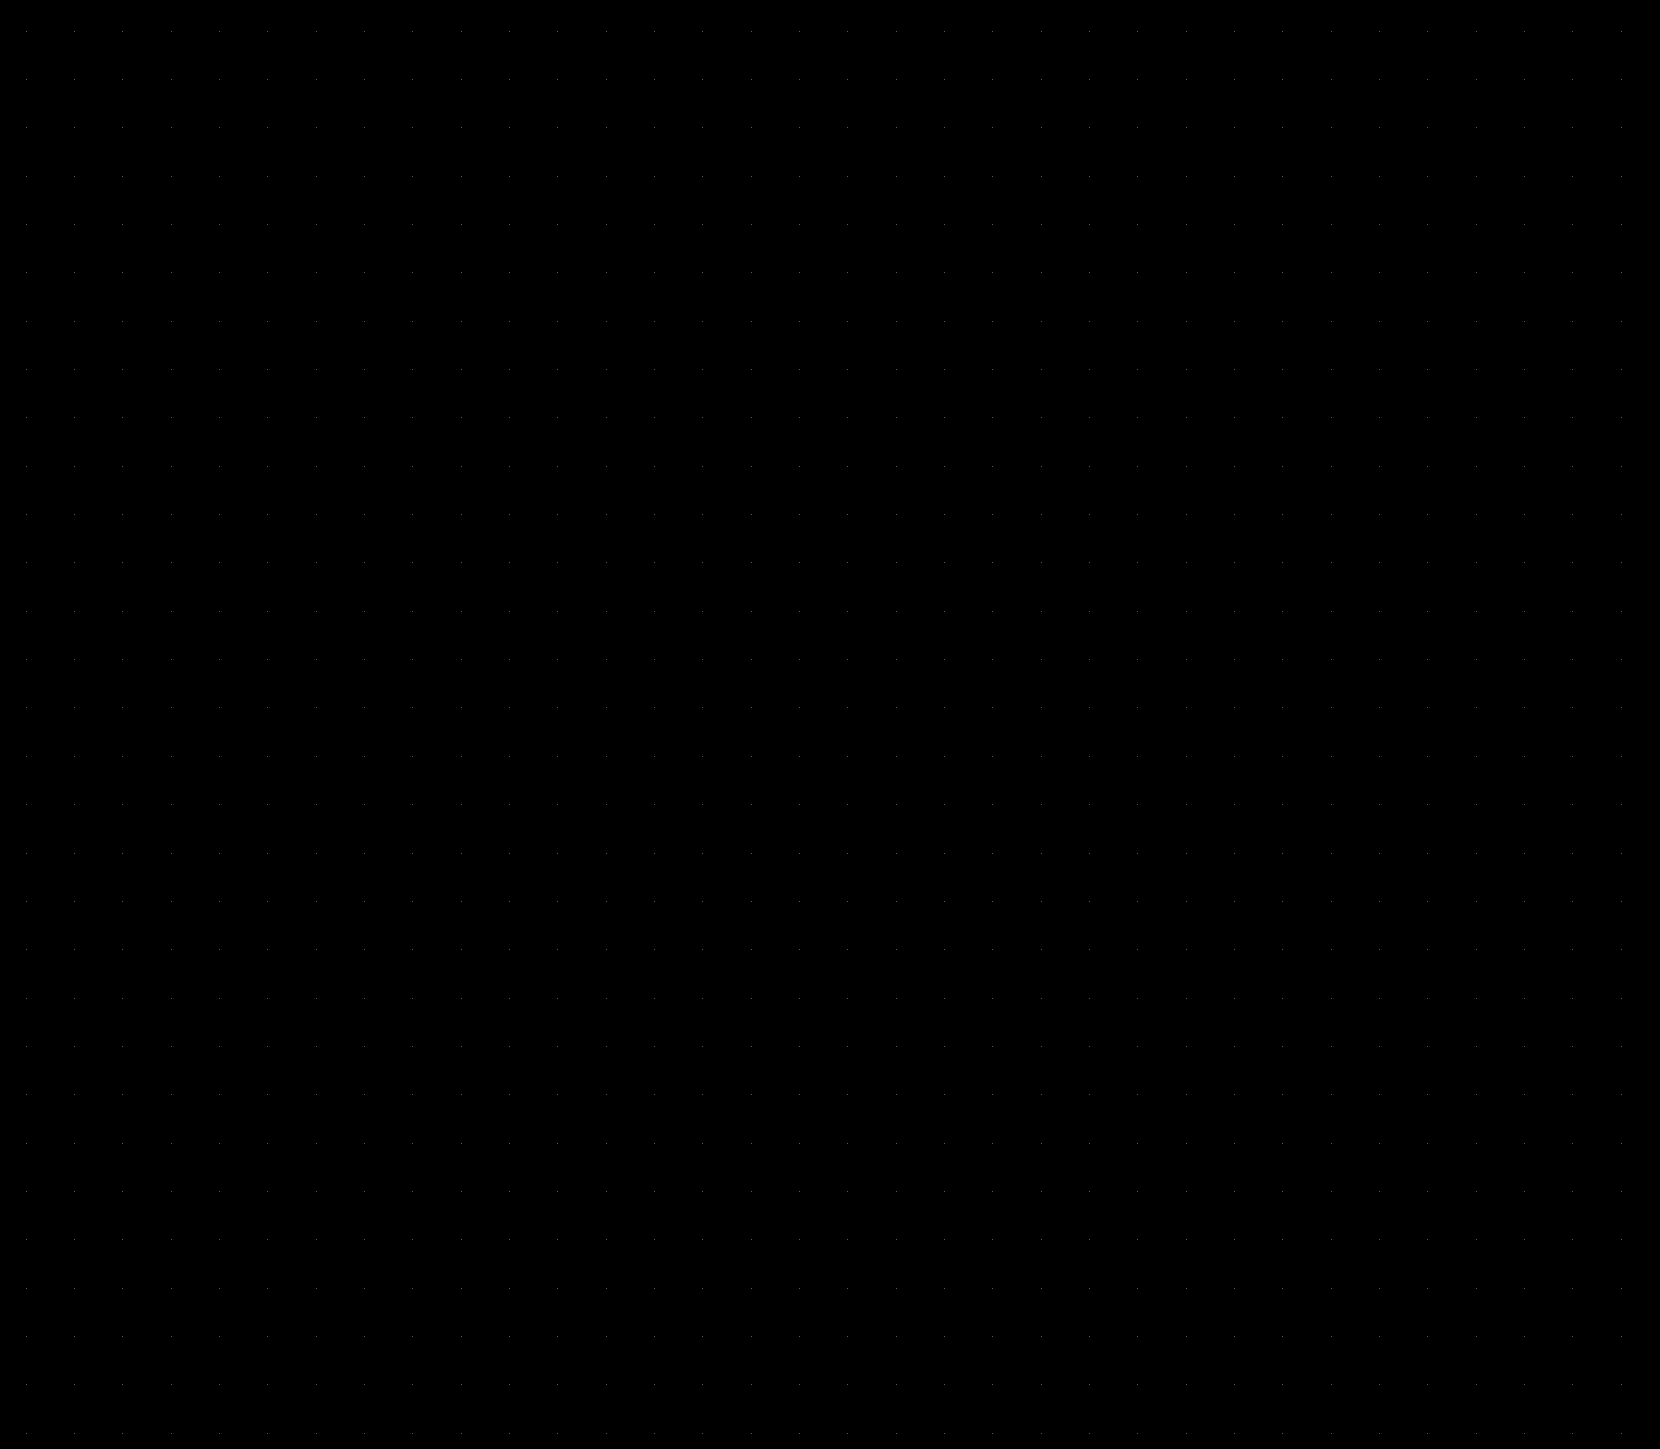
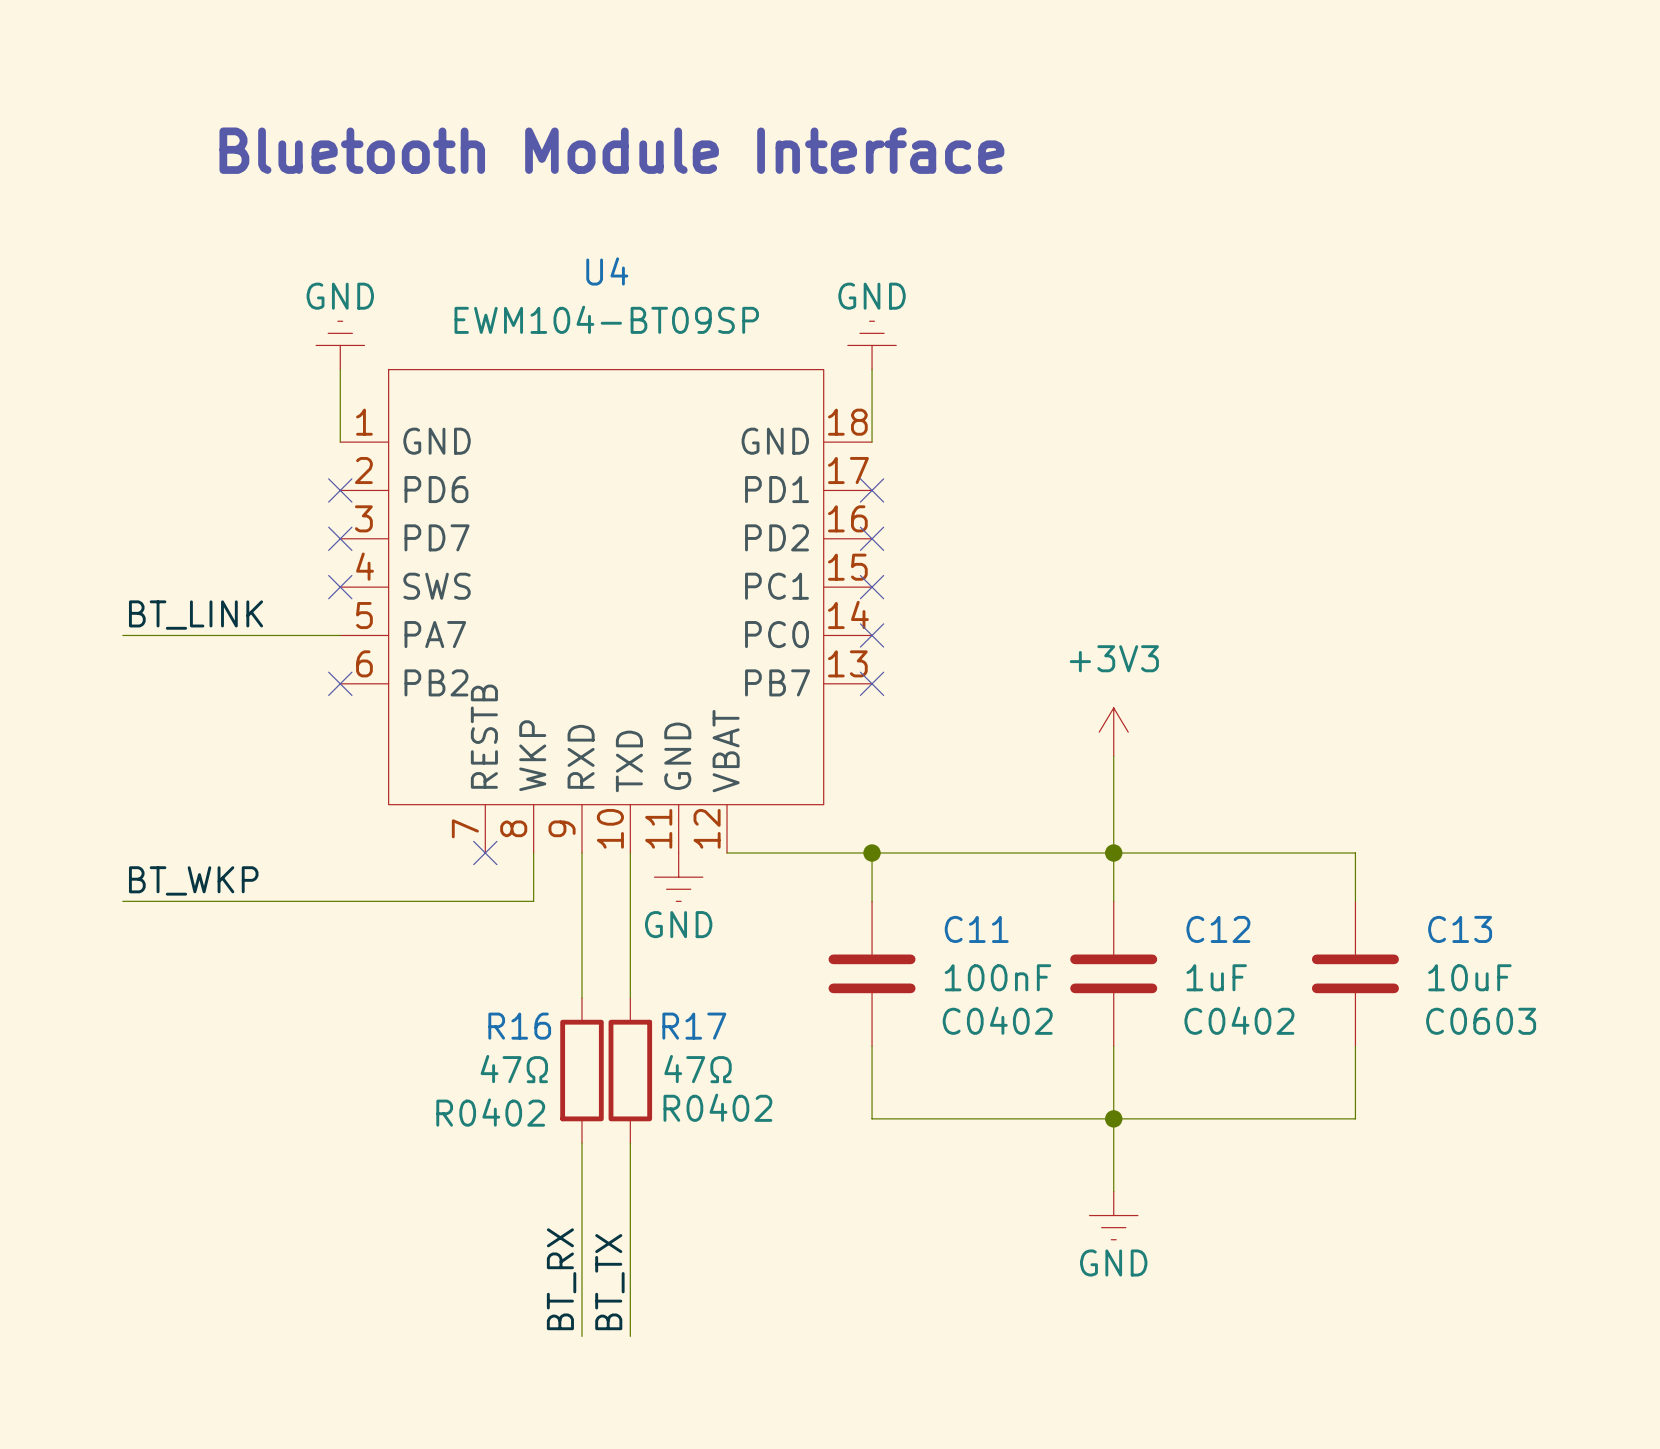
text: none -> Bluetooth Module Interface (611, 150)
power symbol: none -> GND (340, 345)
power symbol: none -> GND (872, 345)
wire: none -> (340, 369) (340, 442)
wire: none -> (872, 369) (872, 442)
no-connect mark: none -> (340, 490)
no-connect mark: none -> (872, 490)
no-connect mark: none -> (340, 538)
no-connect mark: none -> (872, 538)
no-connect mark: none -> (340, 587)
no-connect mark: none -> (872, 587)
U4: none -> EWM104-BT09SP (606, 611)
label: none -> BT_LINK (196, 615)
wire: none -> (122, 635) (340, 635)
no-connect mark: none -> (872, 635)
no-connect mark: none -> (340, 683)
no-connect mark: none -> (872, 683)
power symbol: none -> +3V3 (1113, 732)
wire: none -> (1113, 756) (1113, 901)
no-connect mark: none -> (485, 853)
wire: none -> (533, 853) (533, 901) (122, 901)
wire: none -> (581, 853) (581, 998)
wire: none -> (630, 853) (630, 998)
wire: none -> (727, 853) (1355, 853) (1355, 901)
wire: none -> (872, 853) (872, 901)
junction: none -> (872, 853)
junction: none -> (1113, 853)
power symbol: none -> GND (678, 877)
label: none -> BT_WKP (193, 880)
C11: none -> 100nF (872, 973)
C12: none -> 1uF (1113, 973)
C13: none -> 10uF (1355, 973)
wire: none -> (872, 1046) (872, 1118) (1355, 1118) (1355, 1046)
wire: none -> (1113, 1046) (1113, 1191)
R16: none -> 47Ω (581, 1070)
R17: none -> 47Ω (630, 1070)
junction: none -> (1113, 1118)
wire: none -> (581, 1143) (581, 1336)
wire: none -> (630, 1143) (630, 1336)
power symbol: none -> GND (1113, 1215)
label: none -> BT_RX (561, 1279)
label: none -> BT_TX (609, 1282)

